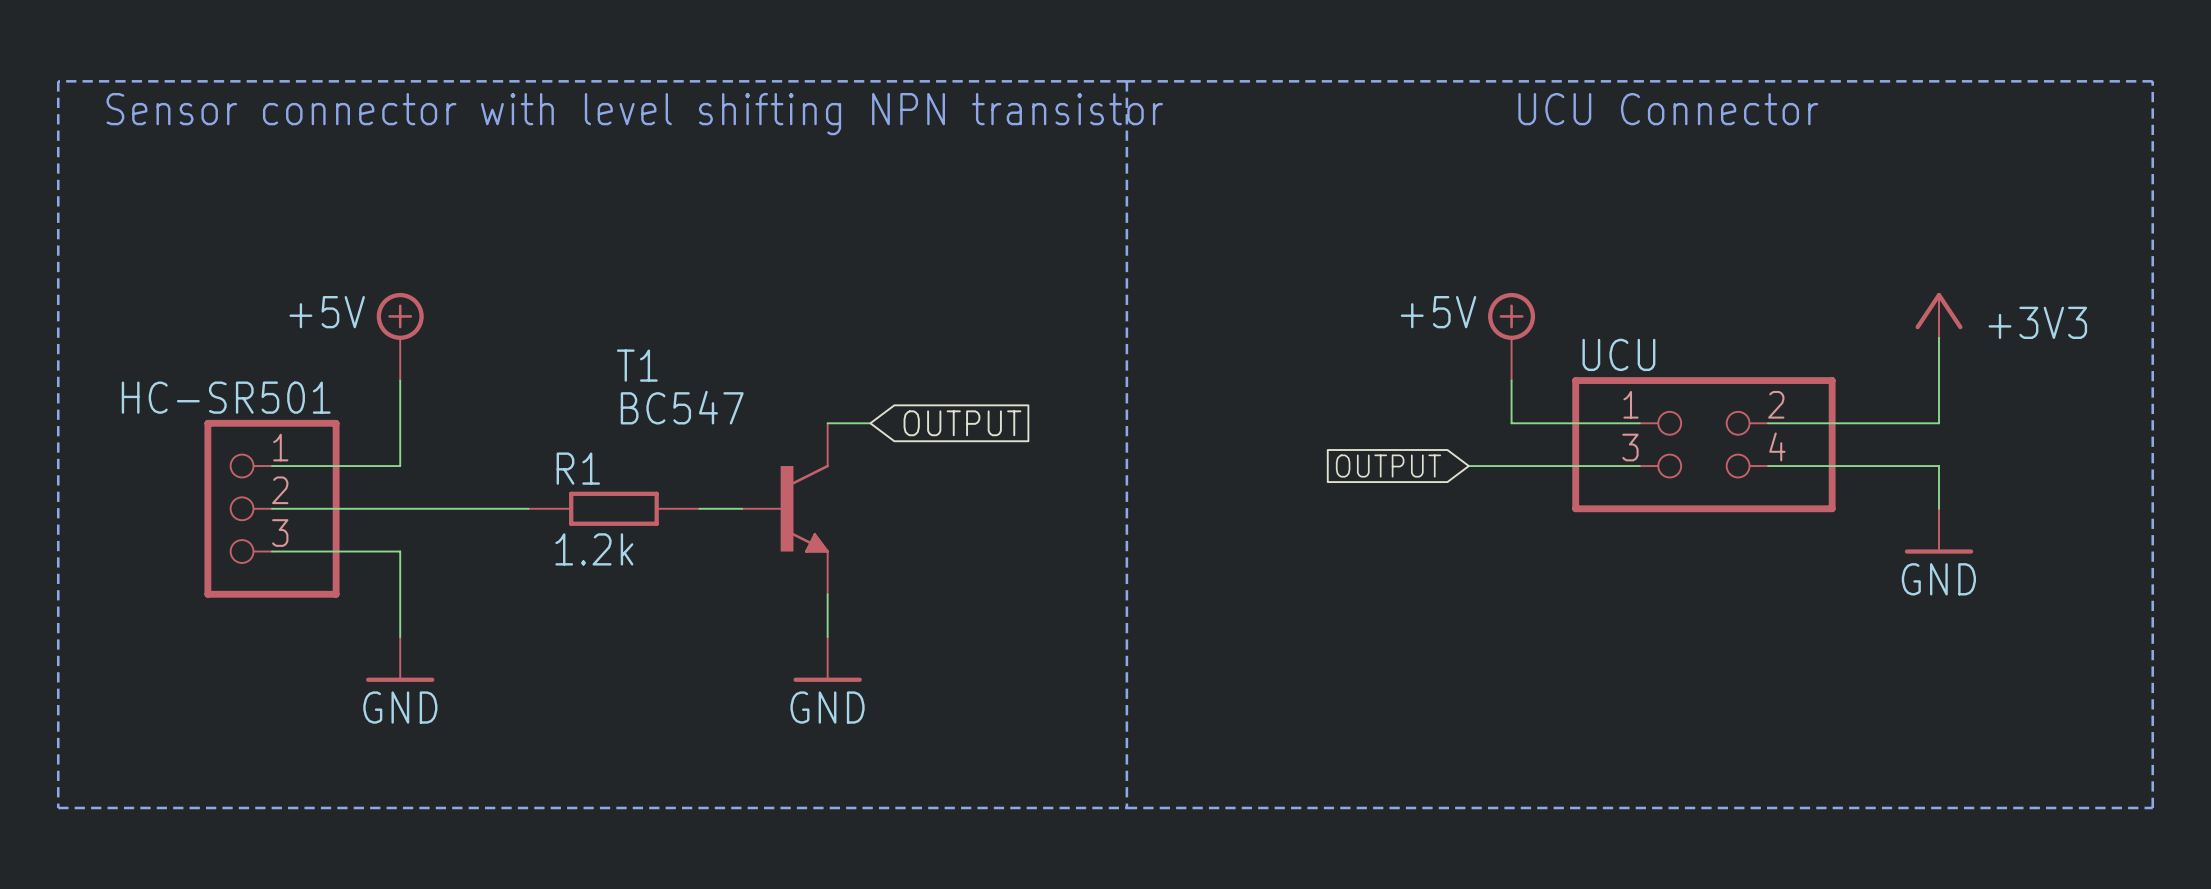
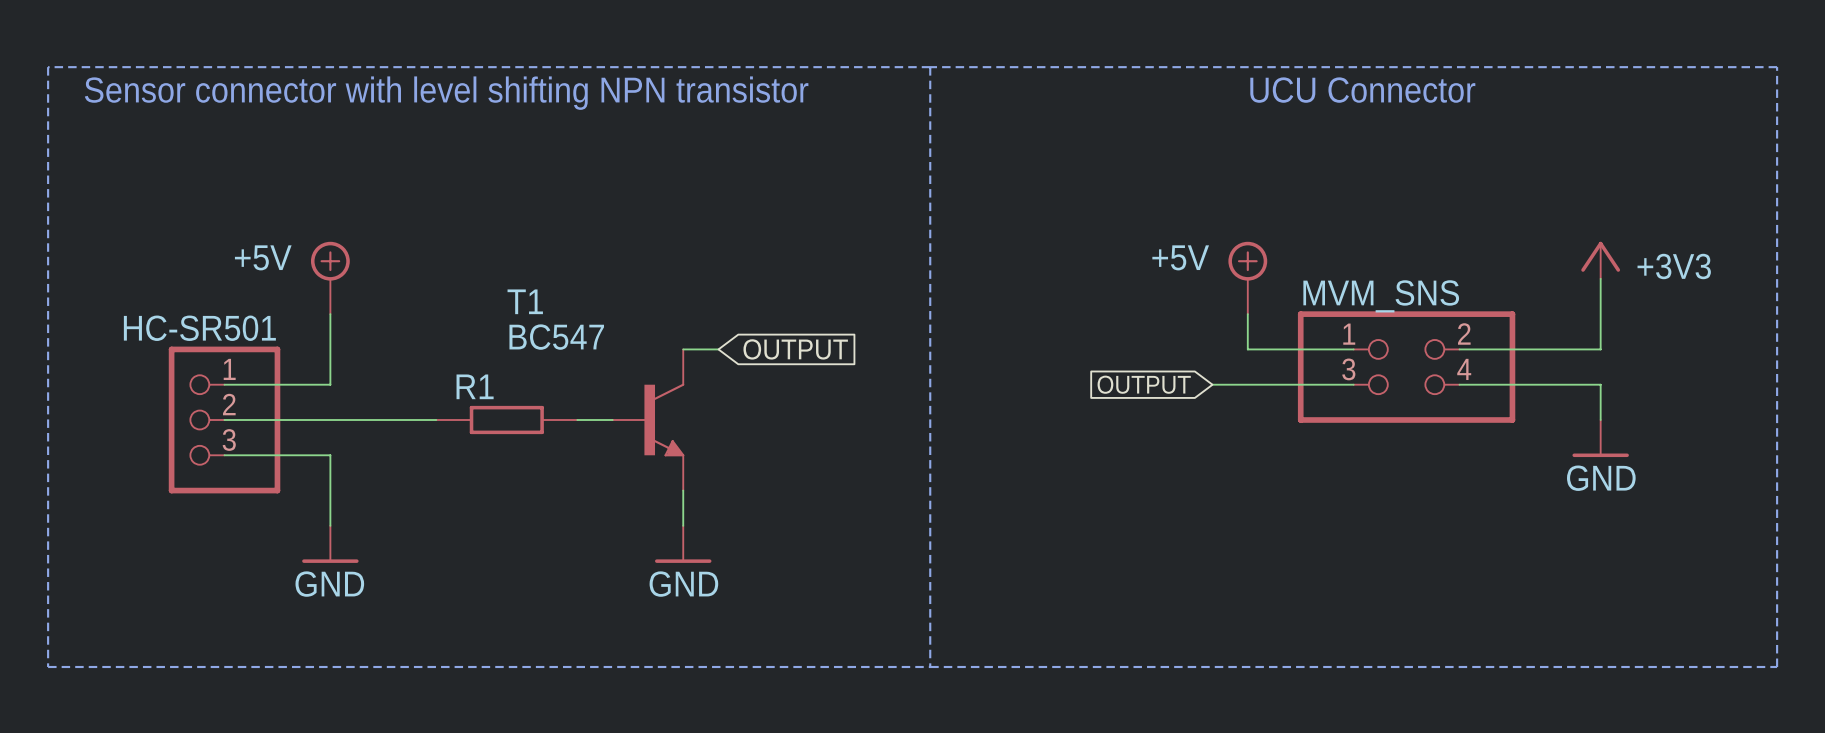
UCU name: UCU (1618, 354) -> MVM_SNS (1381, 296)
R1 value: 1.2k (594, 549) -> none

